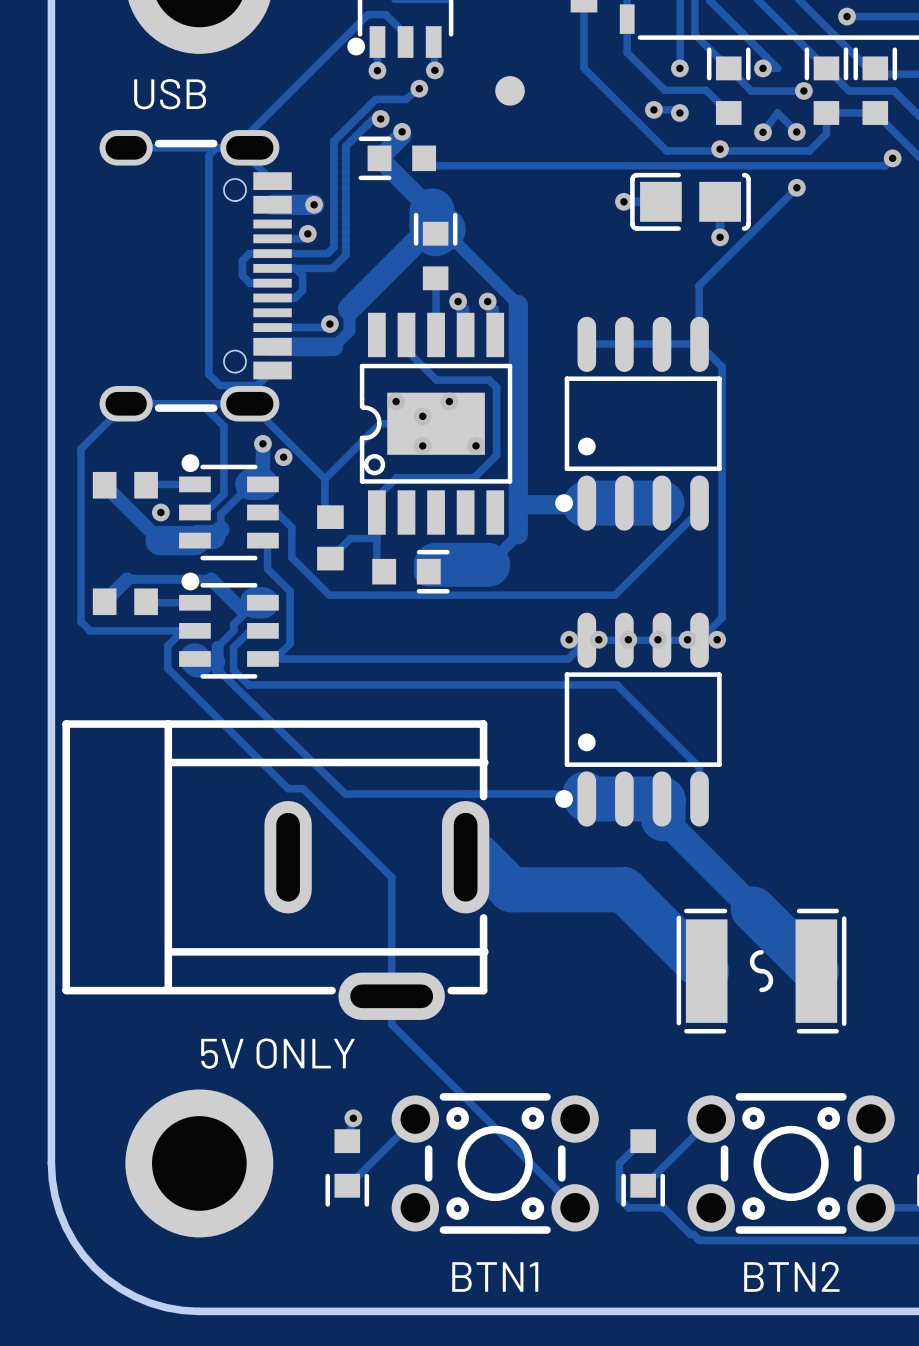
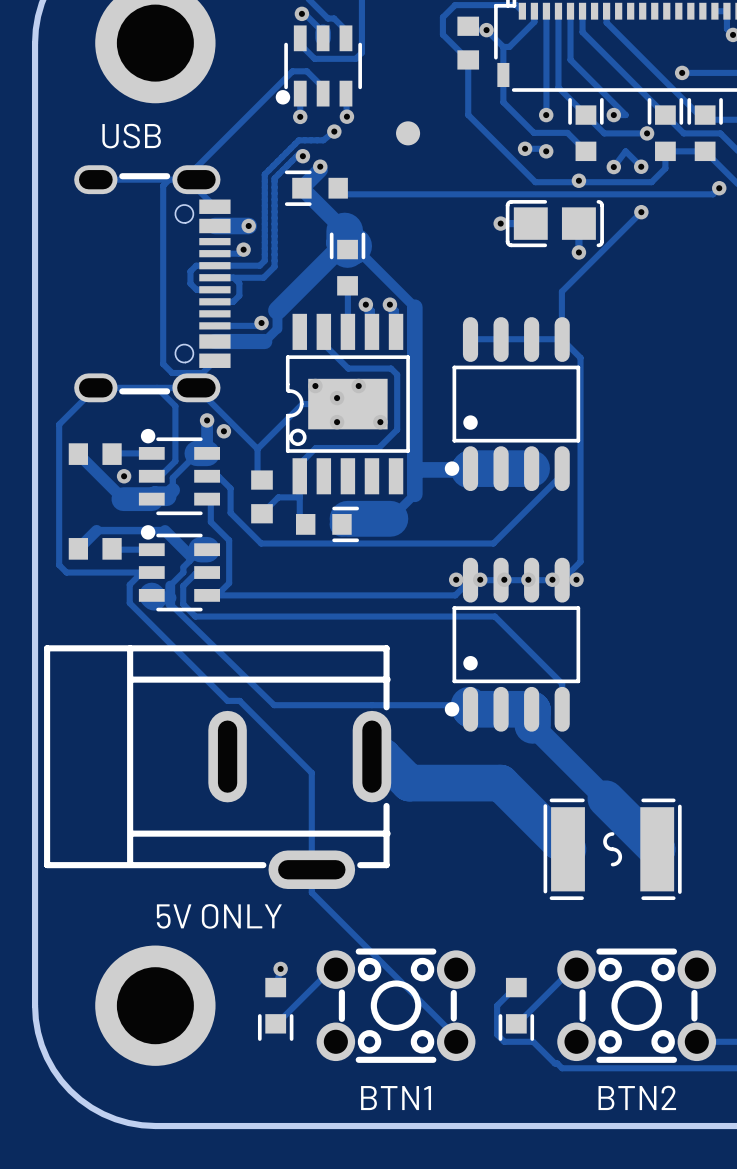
part footprint: [391, 1093, 599, 1234] -> [316, 948, 476, 1063]
part footprint: [687, 1093, 895, 1234] -> [557, 948, 717, 1063]

